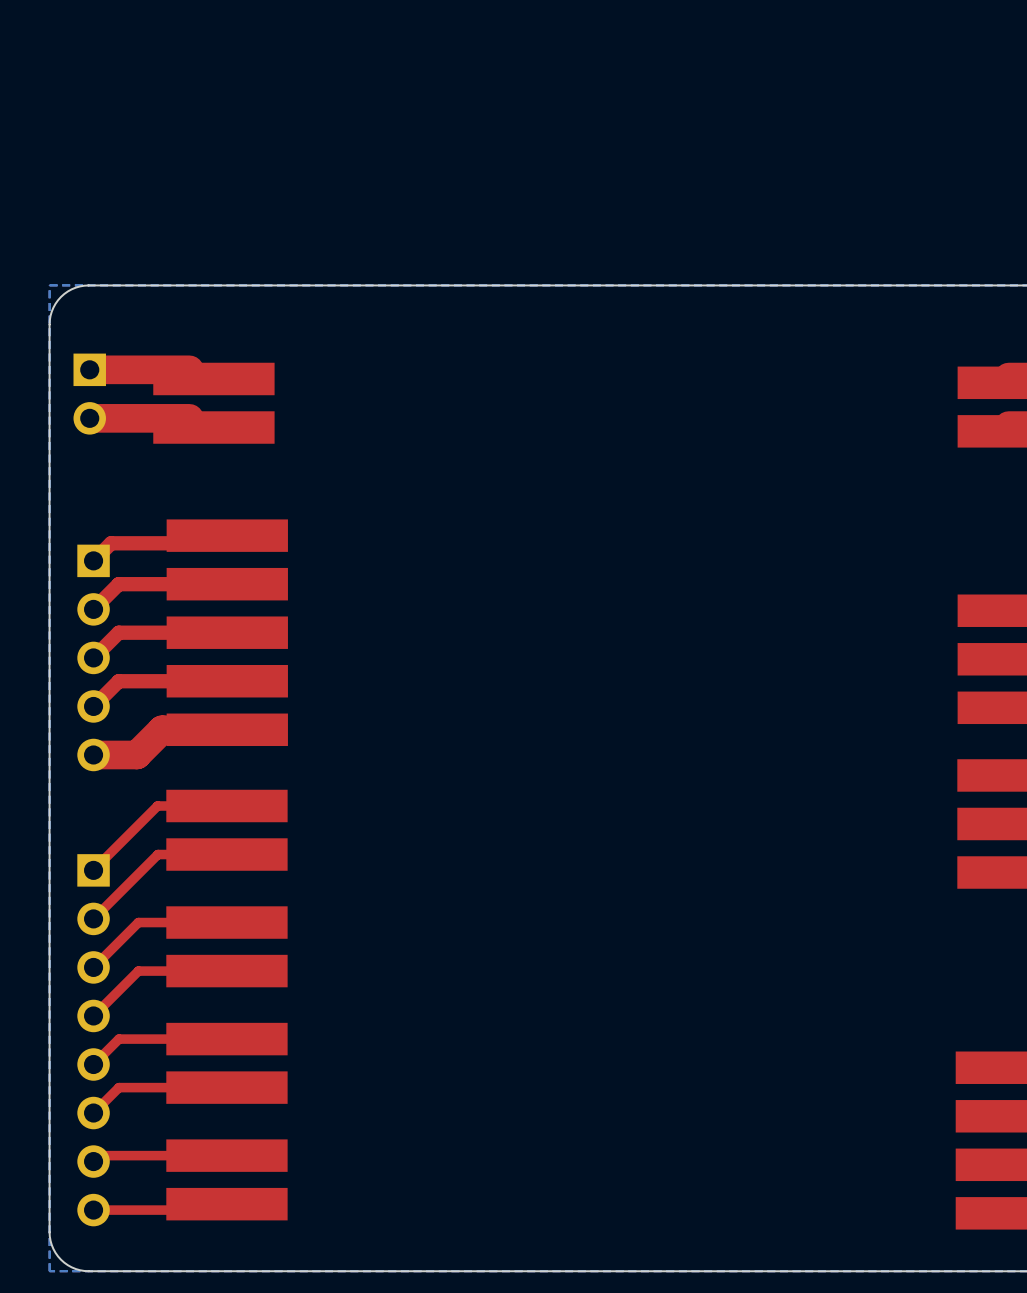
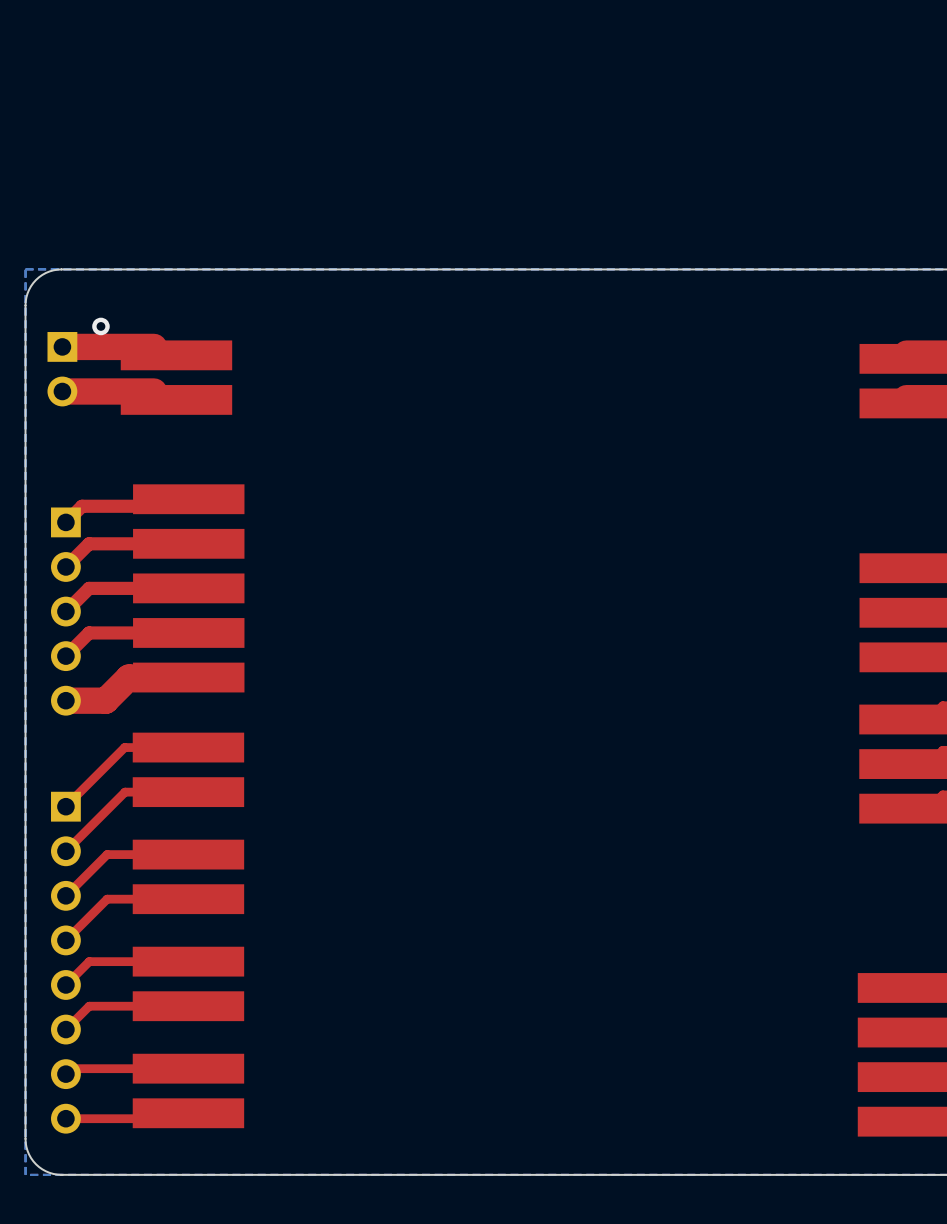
via: none -> (100, 326)

